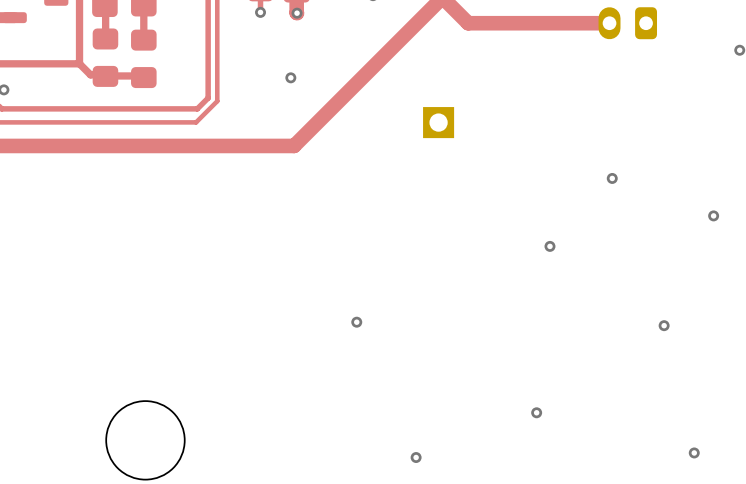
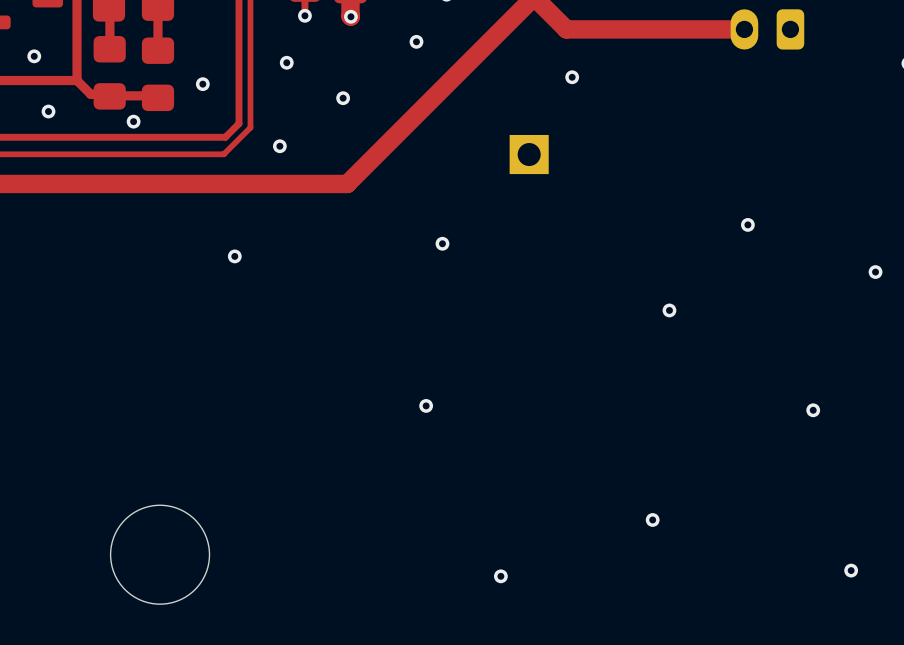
via: none -> (416, 41)
via: none -> (34, 56)
via: none -> (286, 62)
via: none -> (572, 77)
via: none -> (202, 84)
via: none -> (48, 111)
via: none -> (133, 121)
via: none -> (279, 146)
via: none -> (442, 243)
via: none -> (234, 256)

